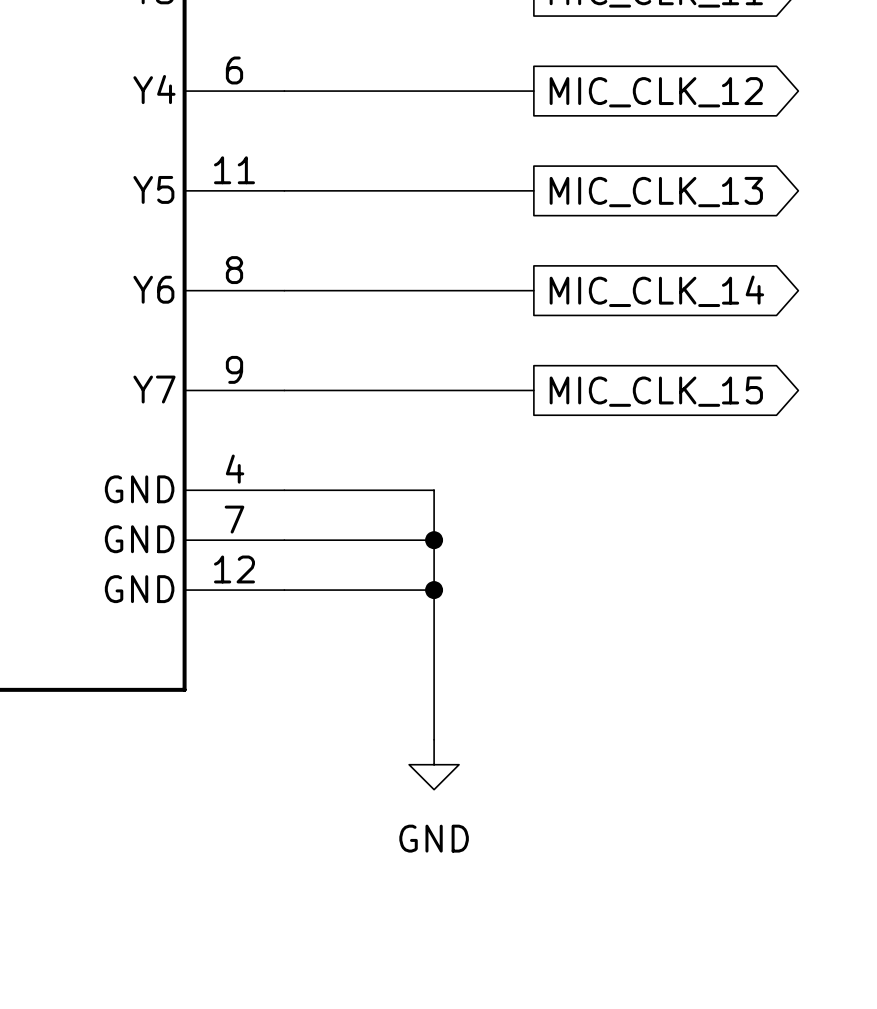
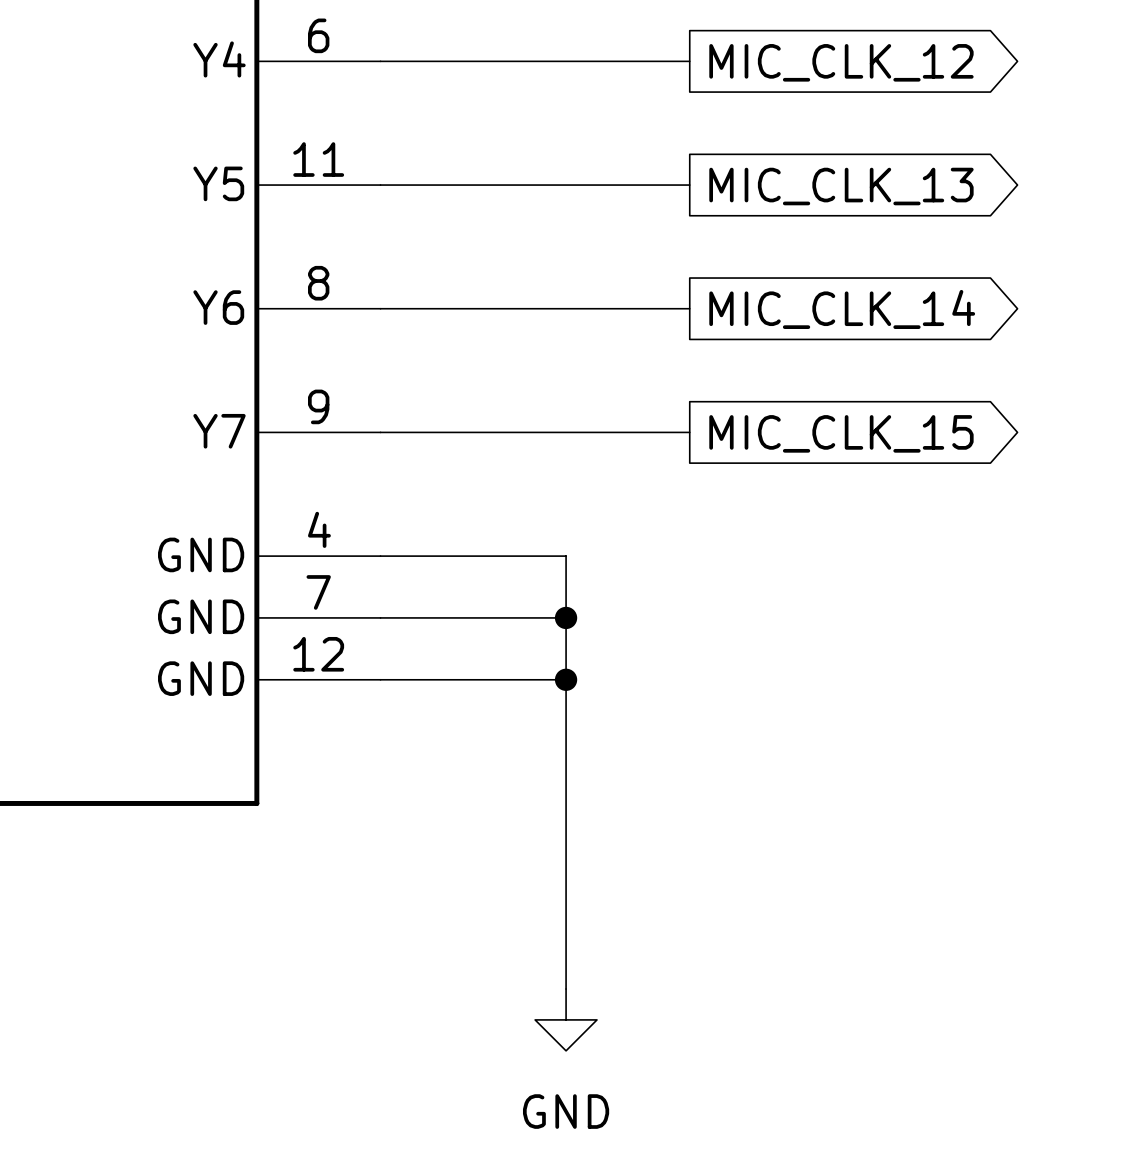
wire: none -> (566, 865) (566, 989)
power symbol position: GND (434, 764) -> GND (566, 1019)

